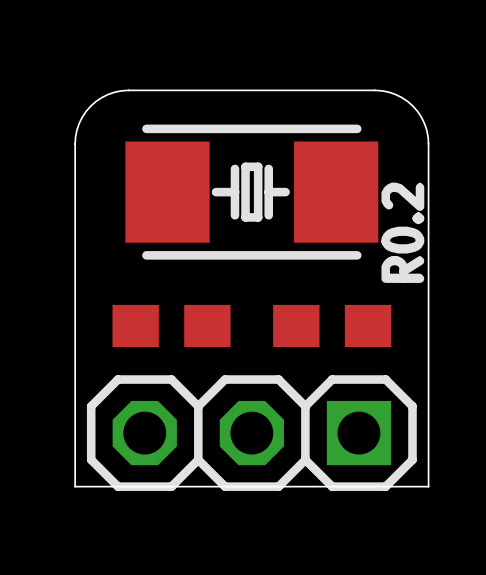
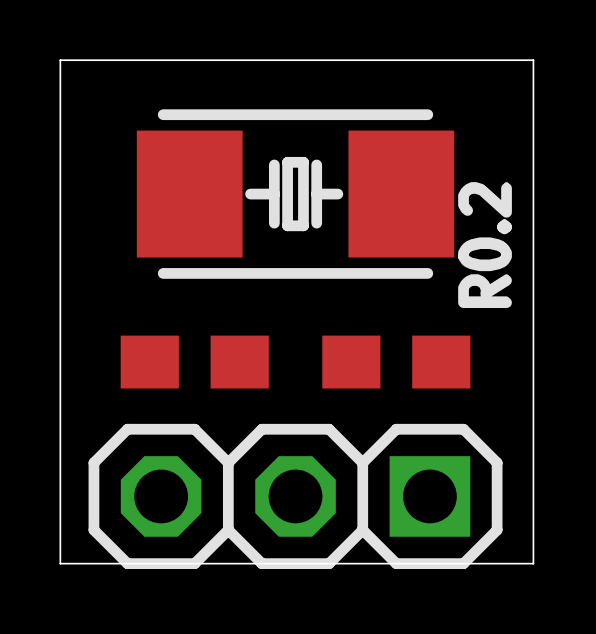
board edge: (75, 486) (75, 136) (82, 117) (96, 101) (114, 92) (128, 90) (382, 90) (401, 97) (417, 111) (426, 130) (428, 143) (428, 486) -> (73, 563) (60, 563) (60, 60) (533, 60) (533, 563) (517, 563)

